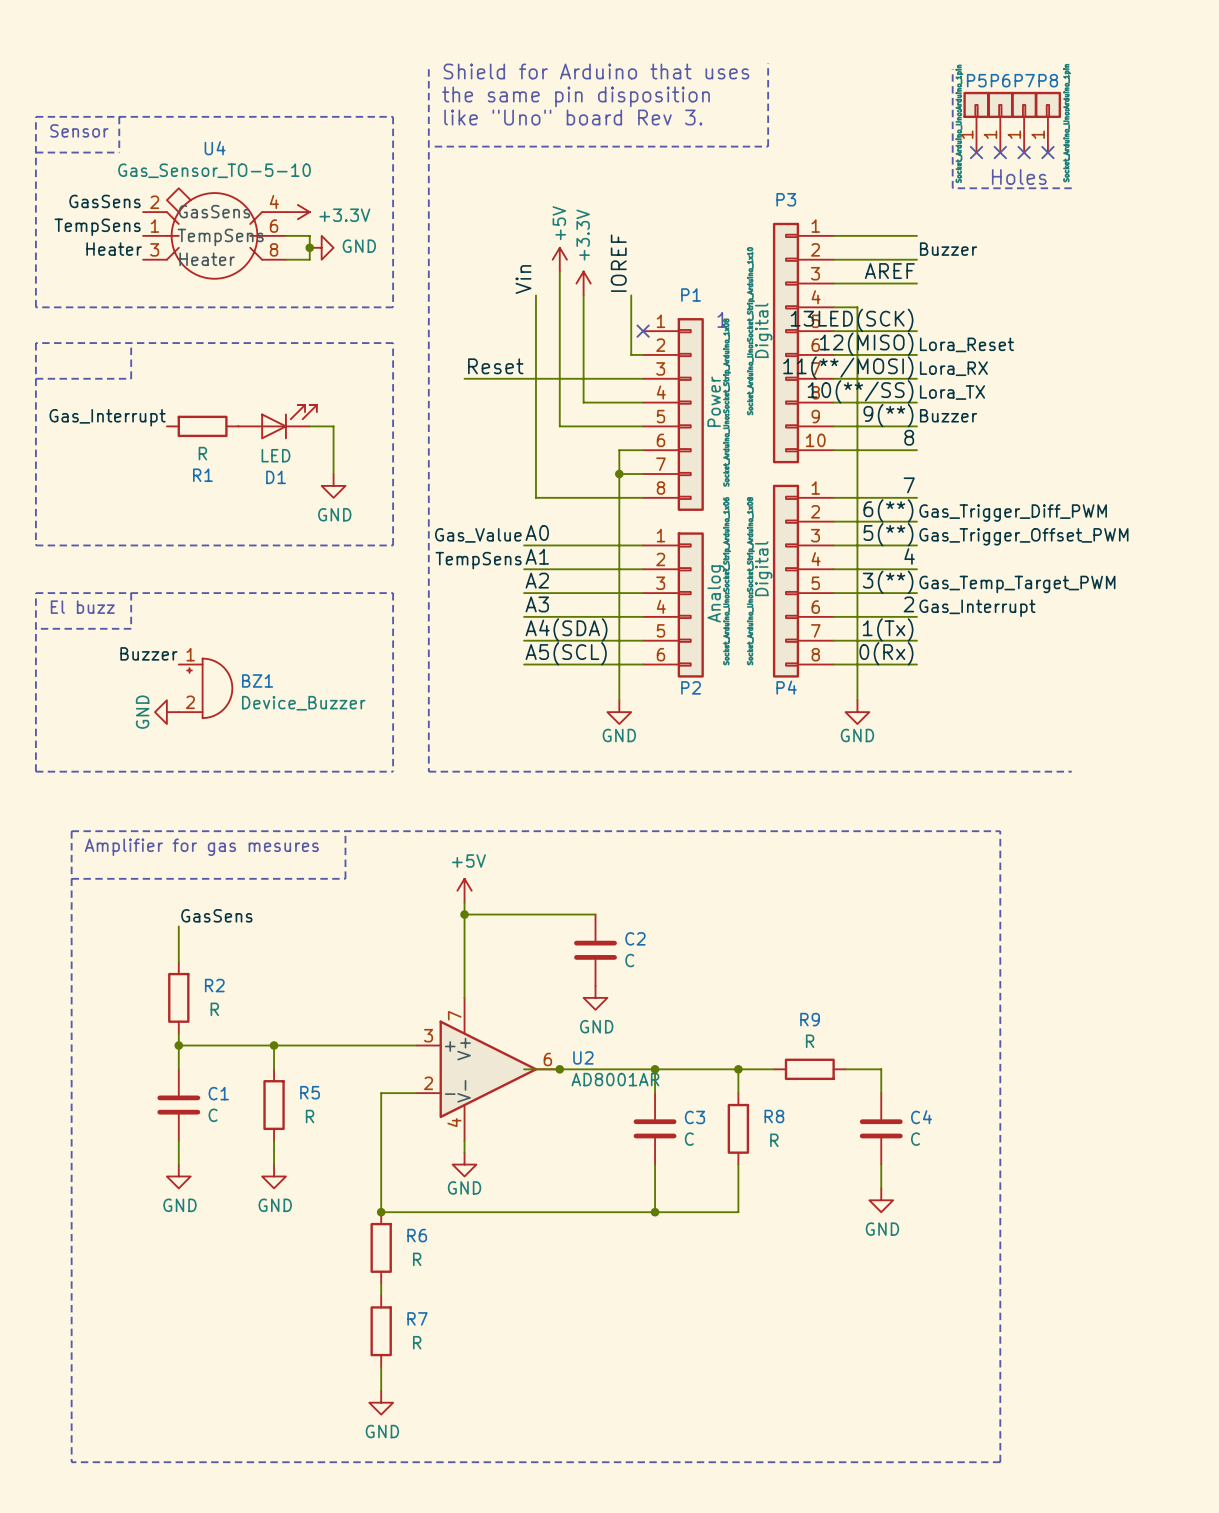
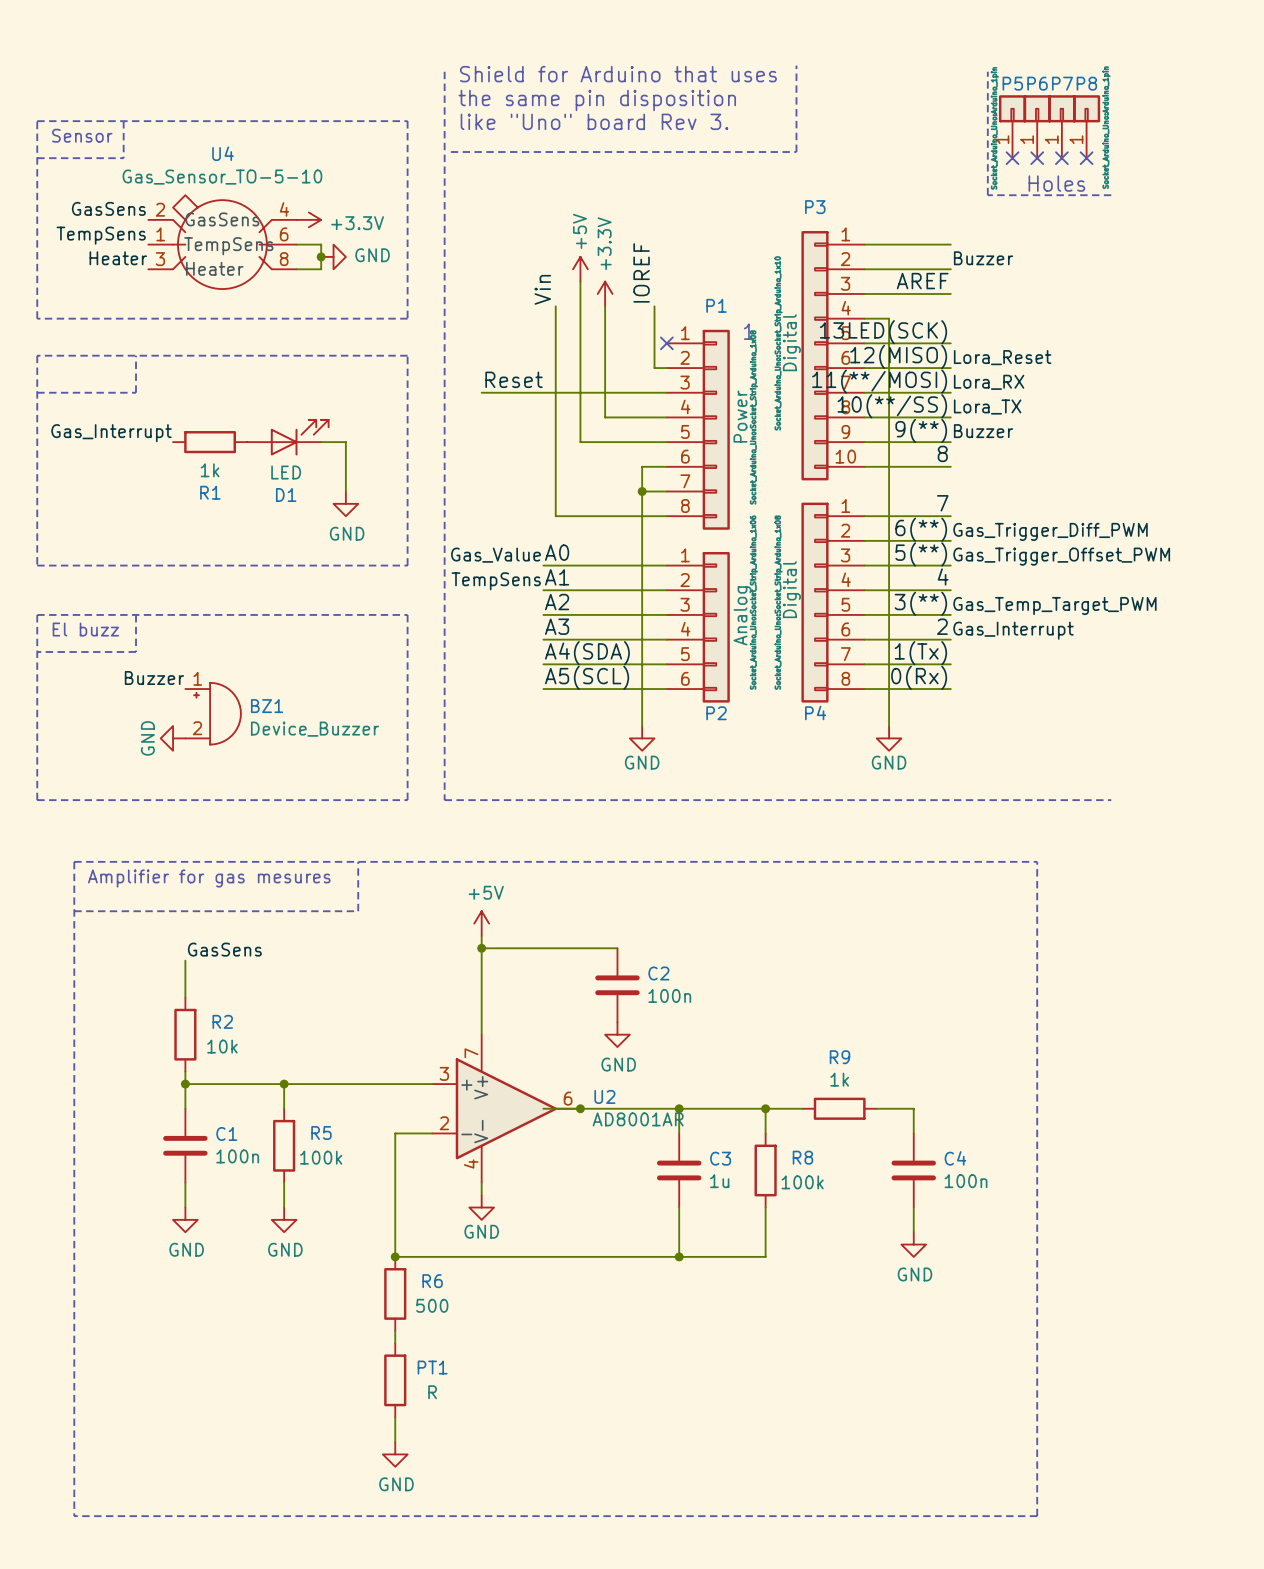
R1 value: R (202, 453) -> 1k (210, 470)
C2 value: C (629, 960) -> 100n (669, 995)
R2 value: R (214, 1009) -> 10k (222, 1046)
R9 value: R (810, 1041) -> 1k (839, 1079)
C1 value: C (213, 1115) -> 100n (237, 1156)
R5 value: R (310, 1116) -> 100k (321, 1157)
C3 value: C (689, 1139) -> 1u (719, 1181)
C4 value: C (915, 1139) -> 100n (966, 1181)
R8 value: R (774, 1140) -> 100k (802, 1182)
R6 value: R (417, 1259) -> 500 (432, 1305)
R7 name: R7 (417, 1318) -> PT1 (432, 1367)

